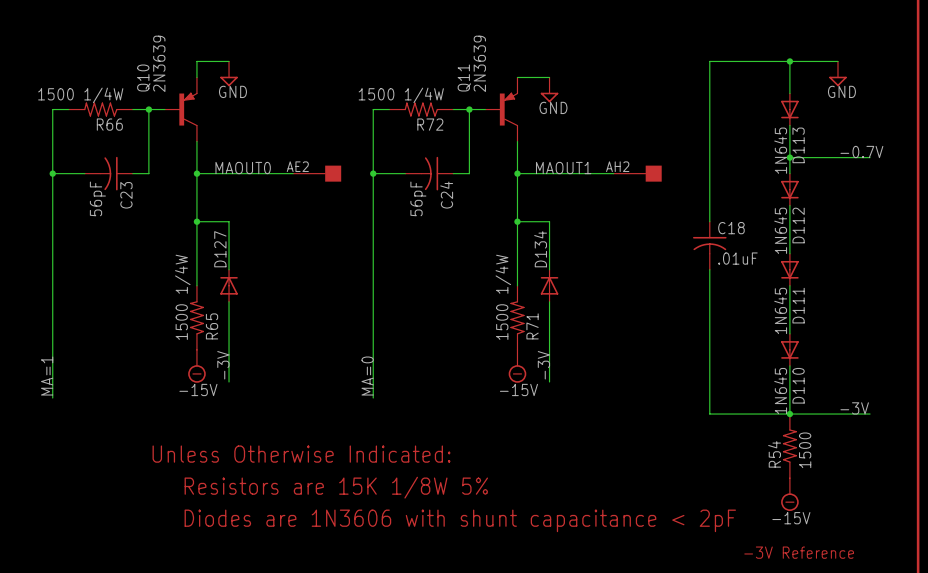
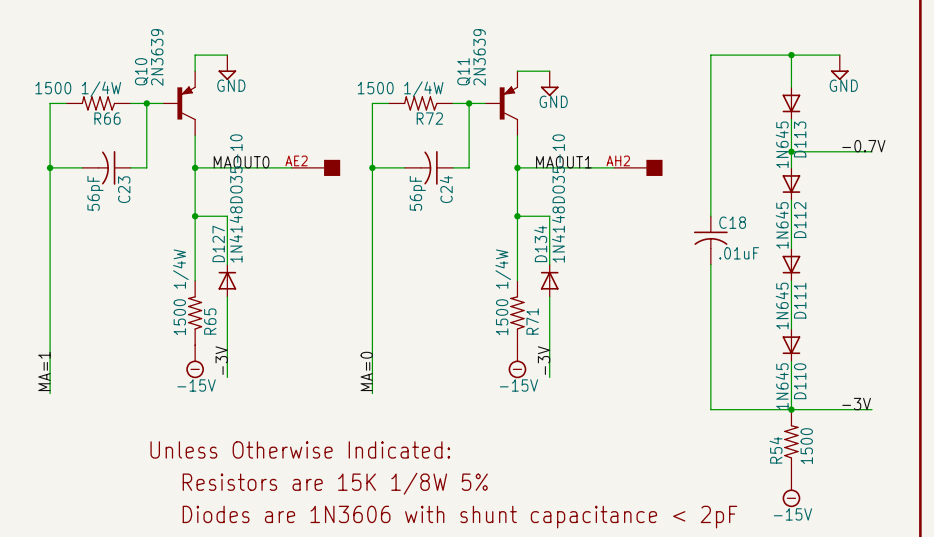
D127 value: none -> 1N4148DO35-10 (236, 198)
D134 value: none -> 1N4148DO35-10 (558, 198)

